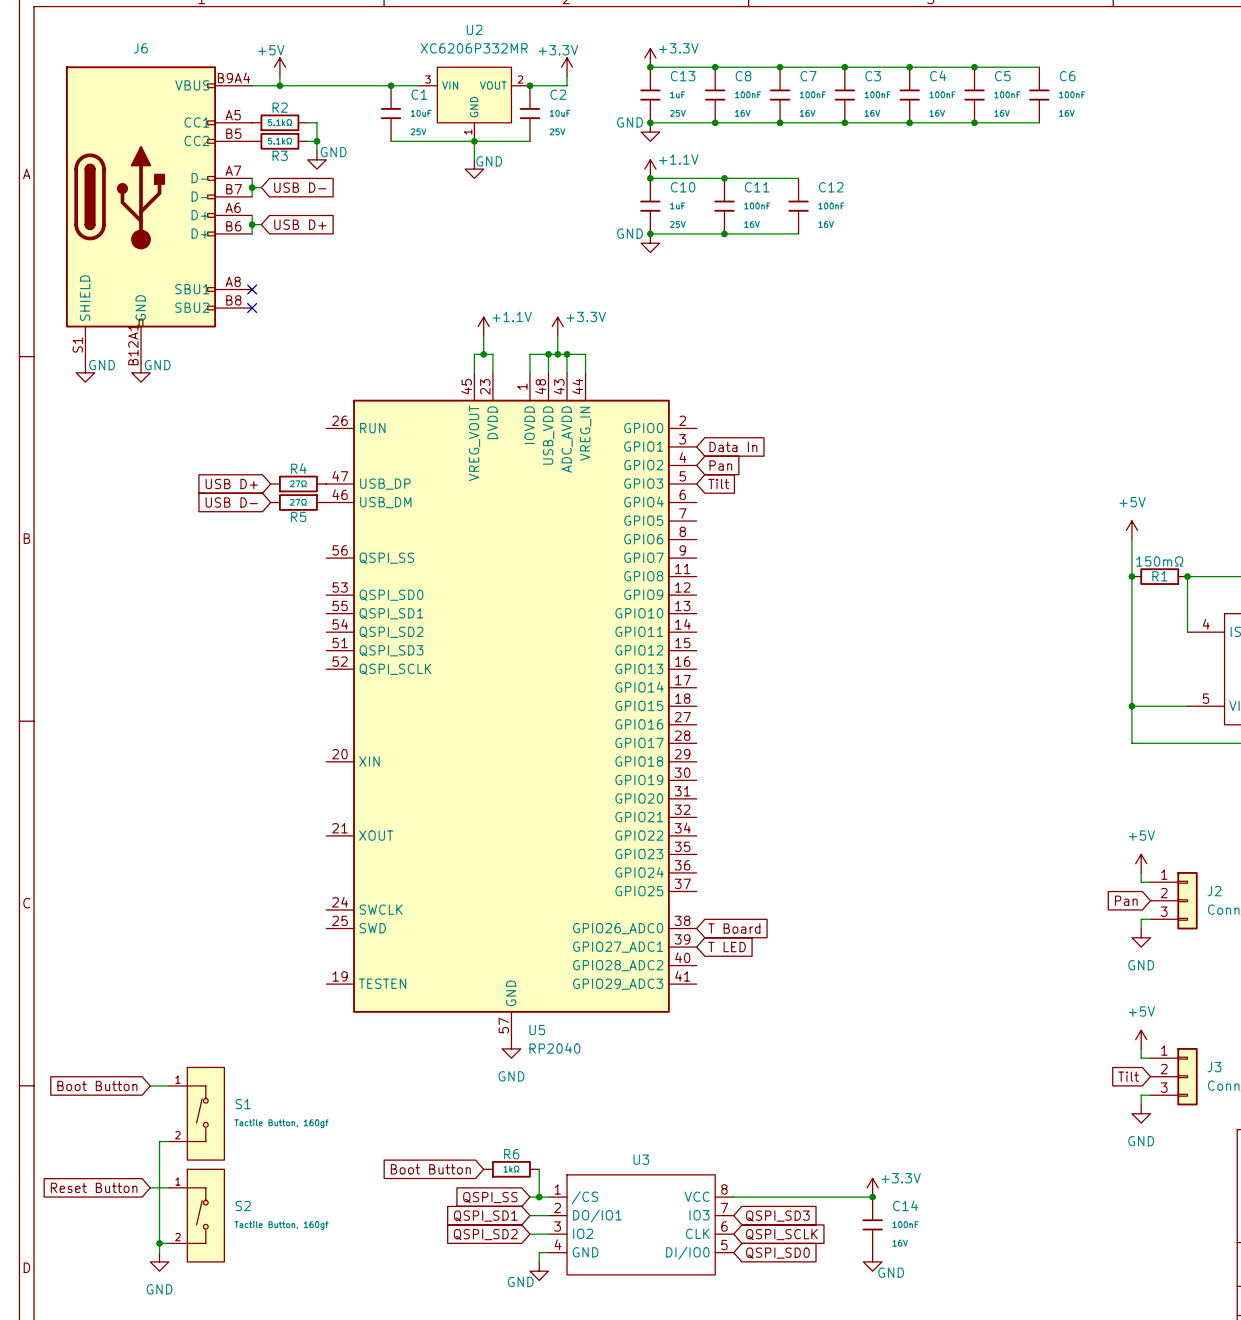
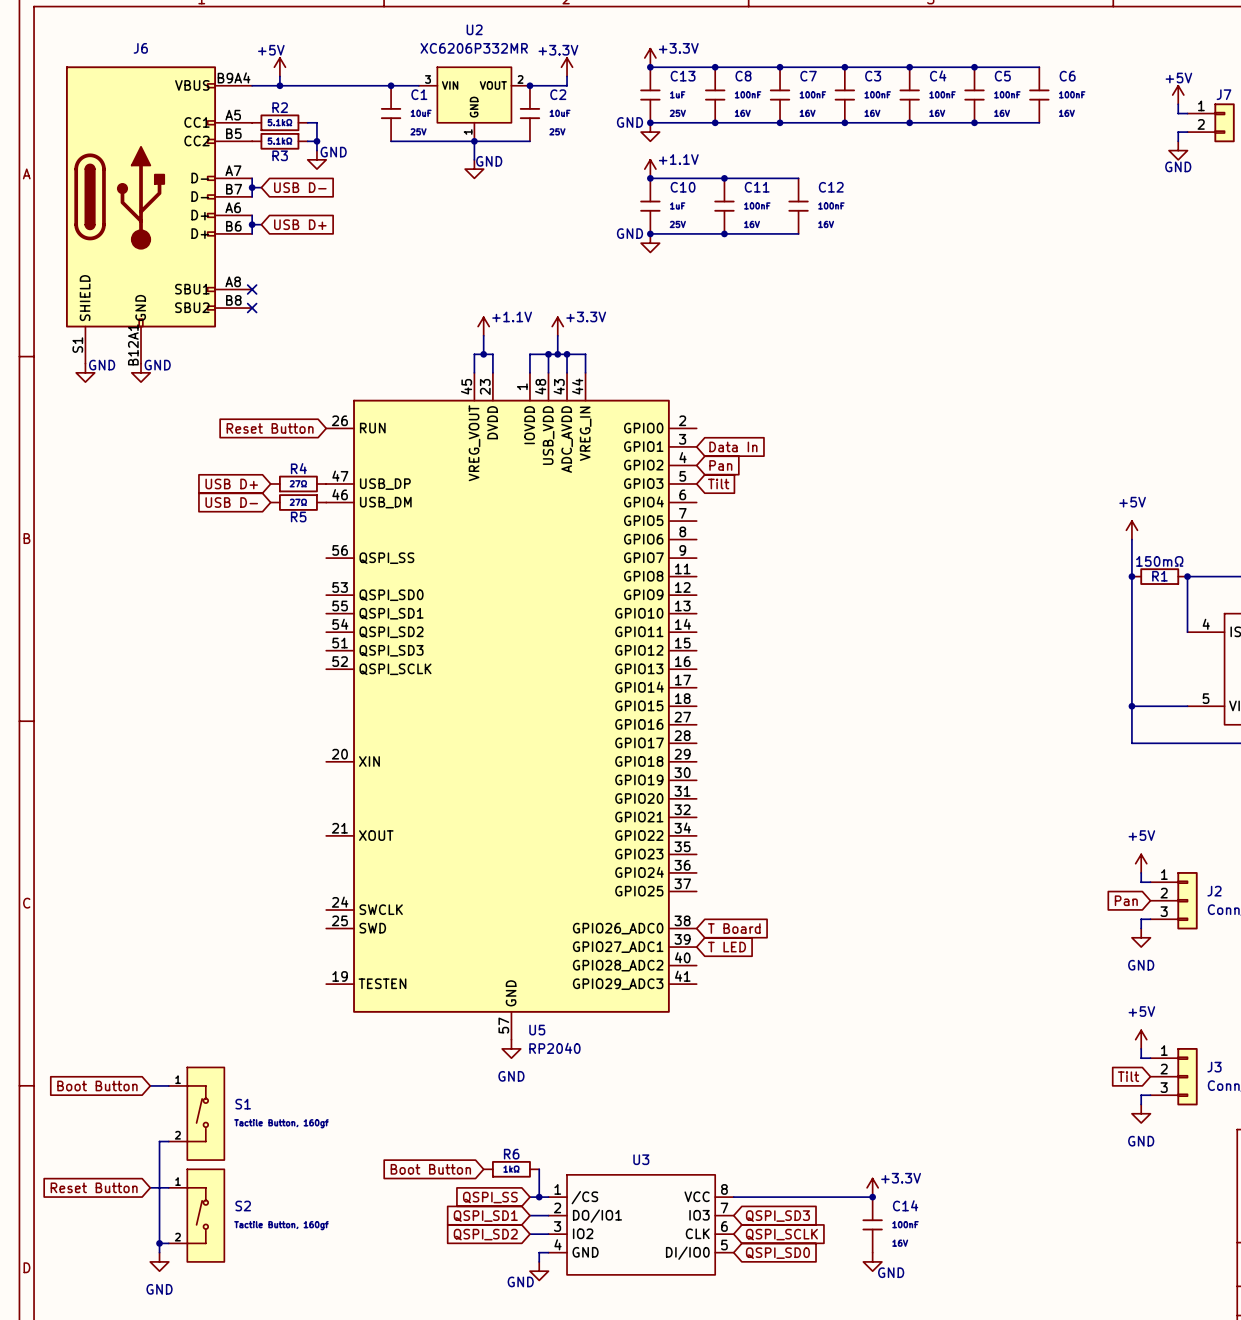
power symbol: none -> +5V (1178, 95)
wire: none -> (1178, 104) (1178, 113) (1187, 113)
J7: none -> (1211, 122)
wire: none -> (1187, 132) (1178, 132) (1178, 141)
power symbol: none -> GND (1178, 150)
global label: none -> Reset Button (270, 428)

